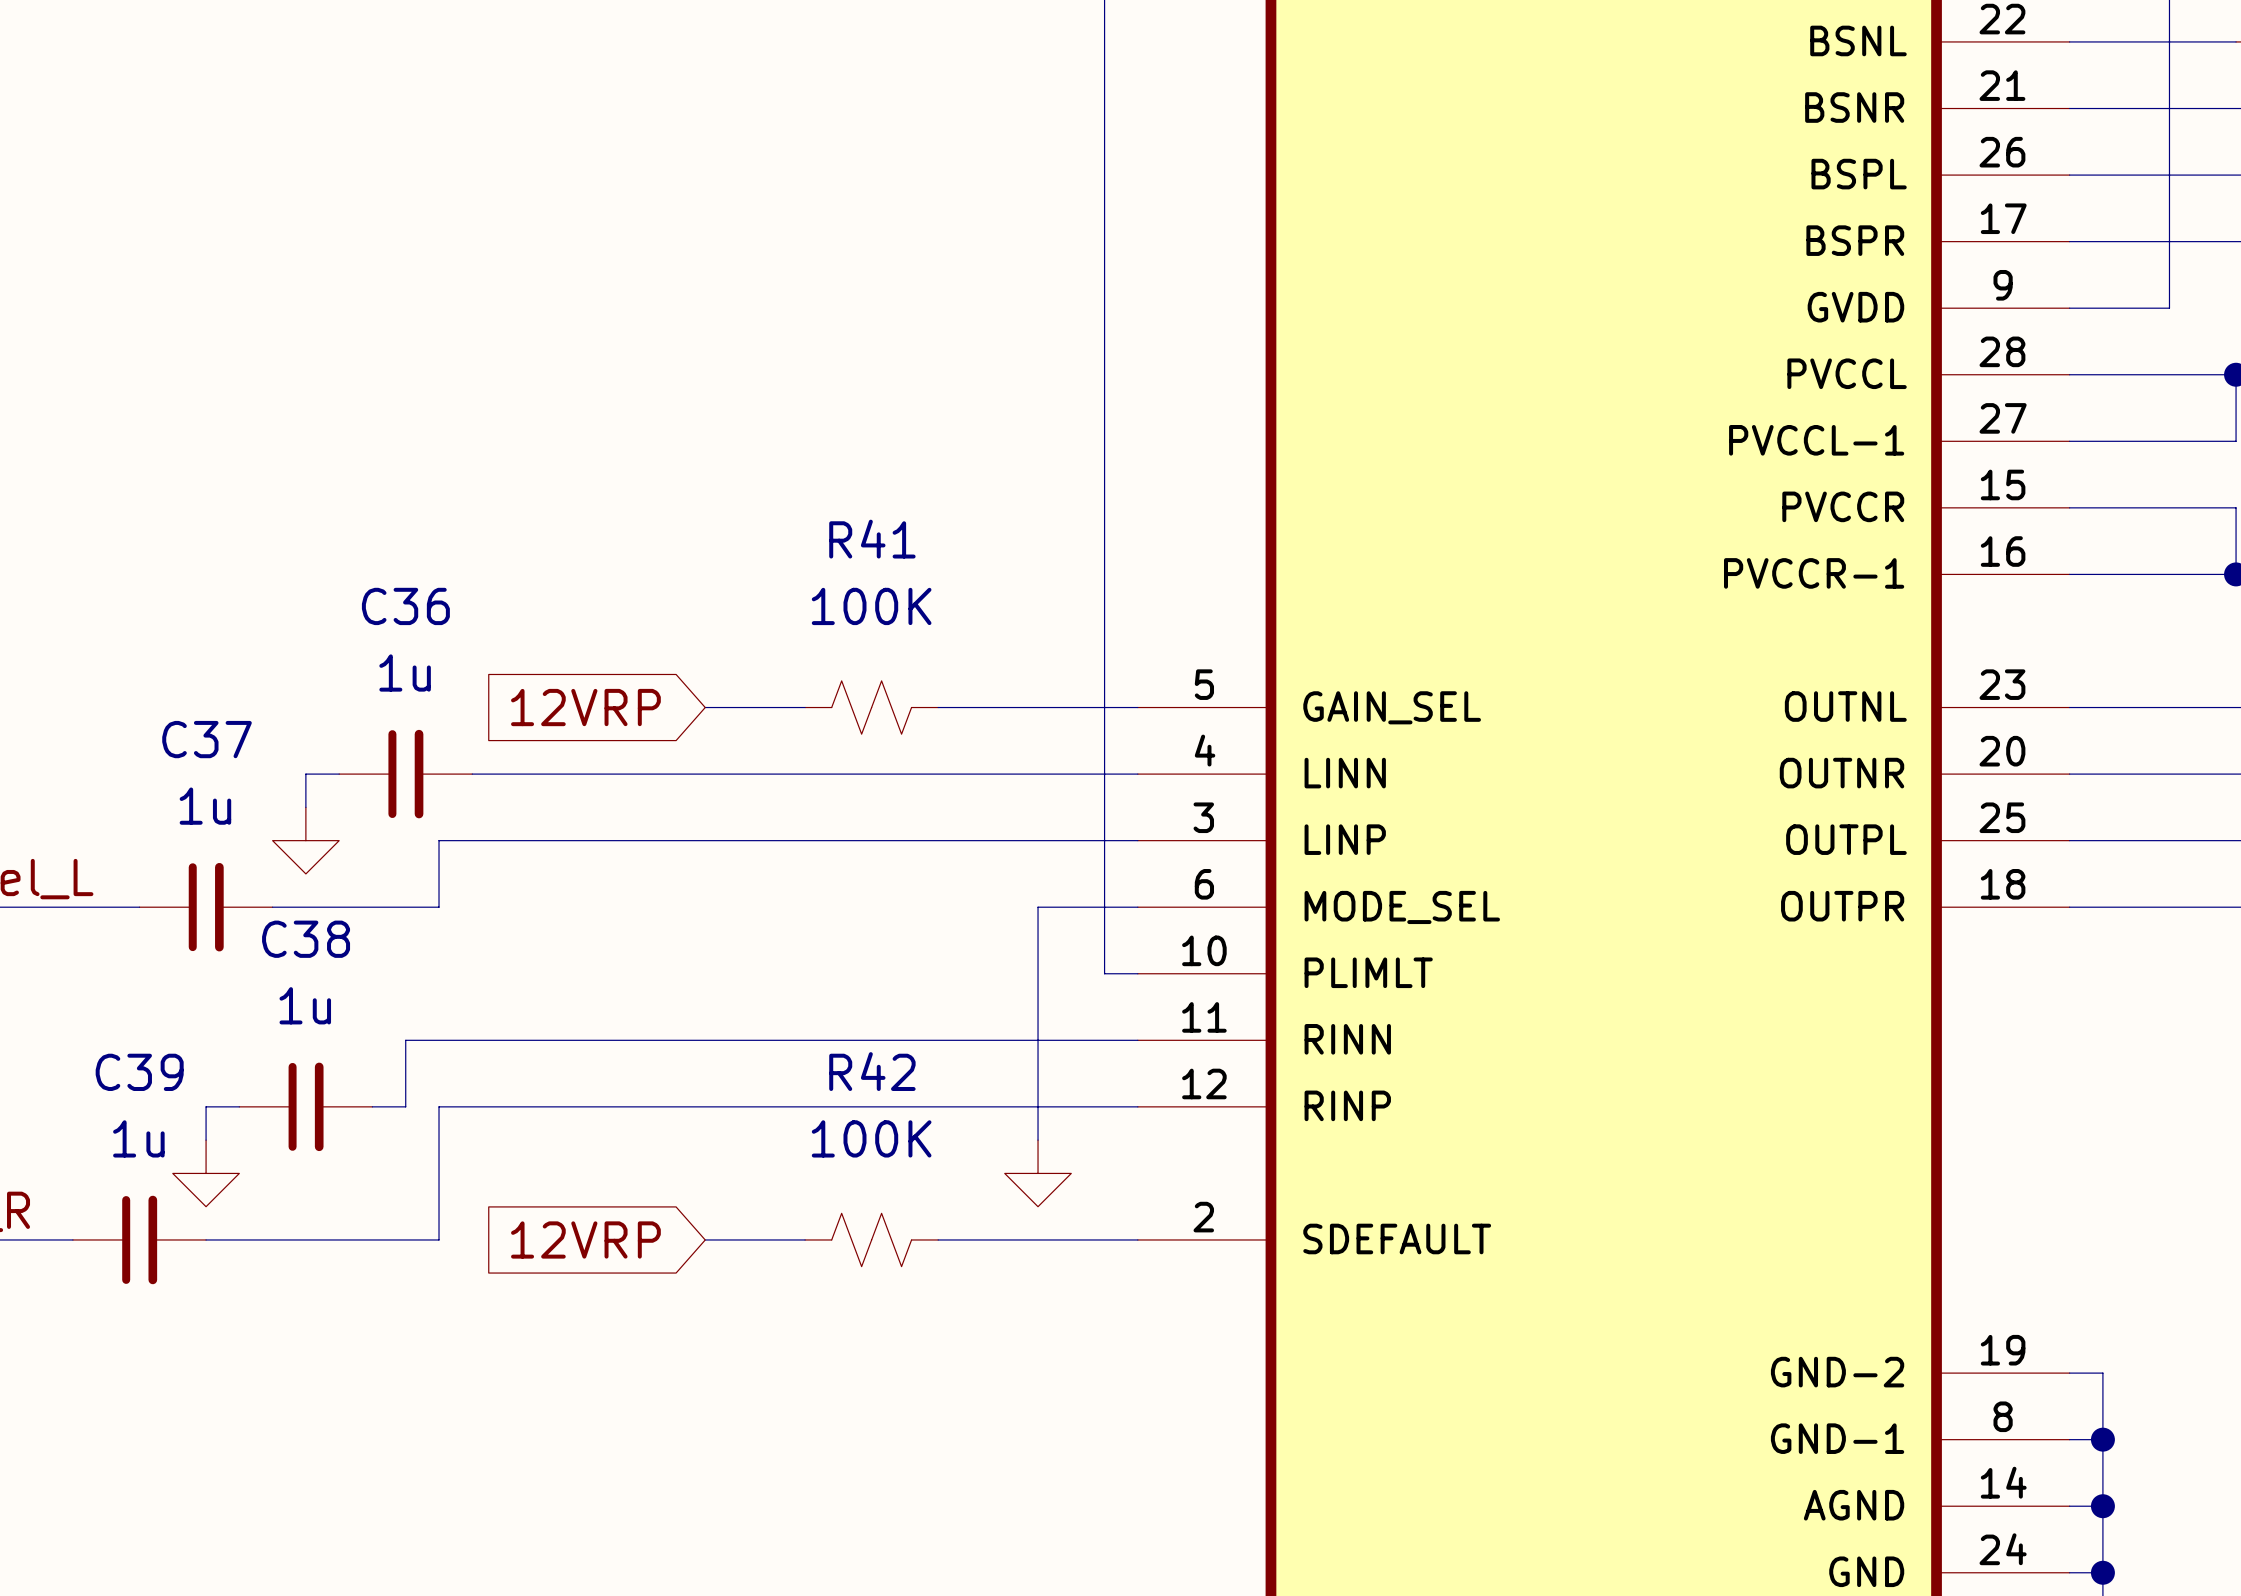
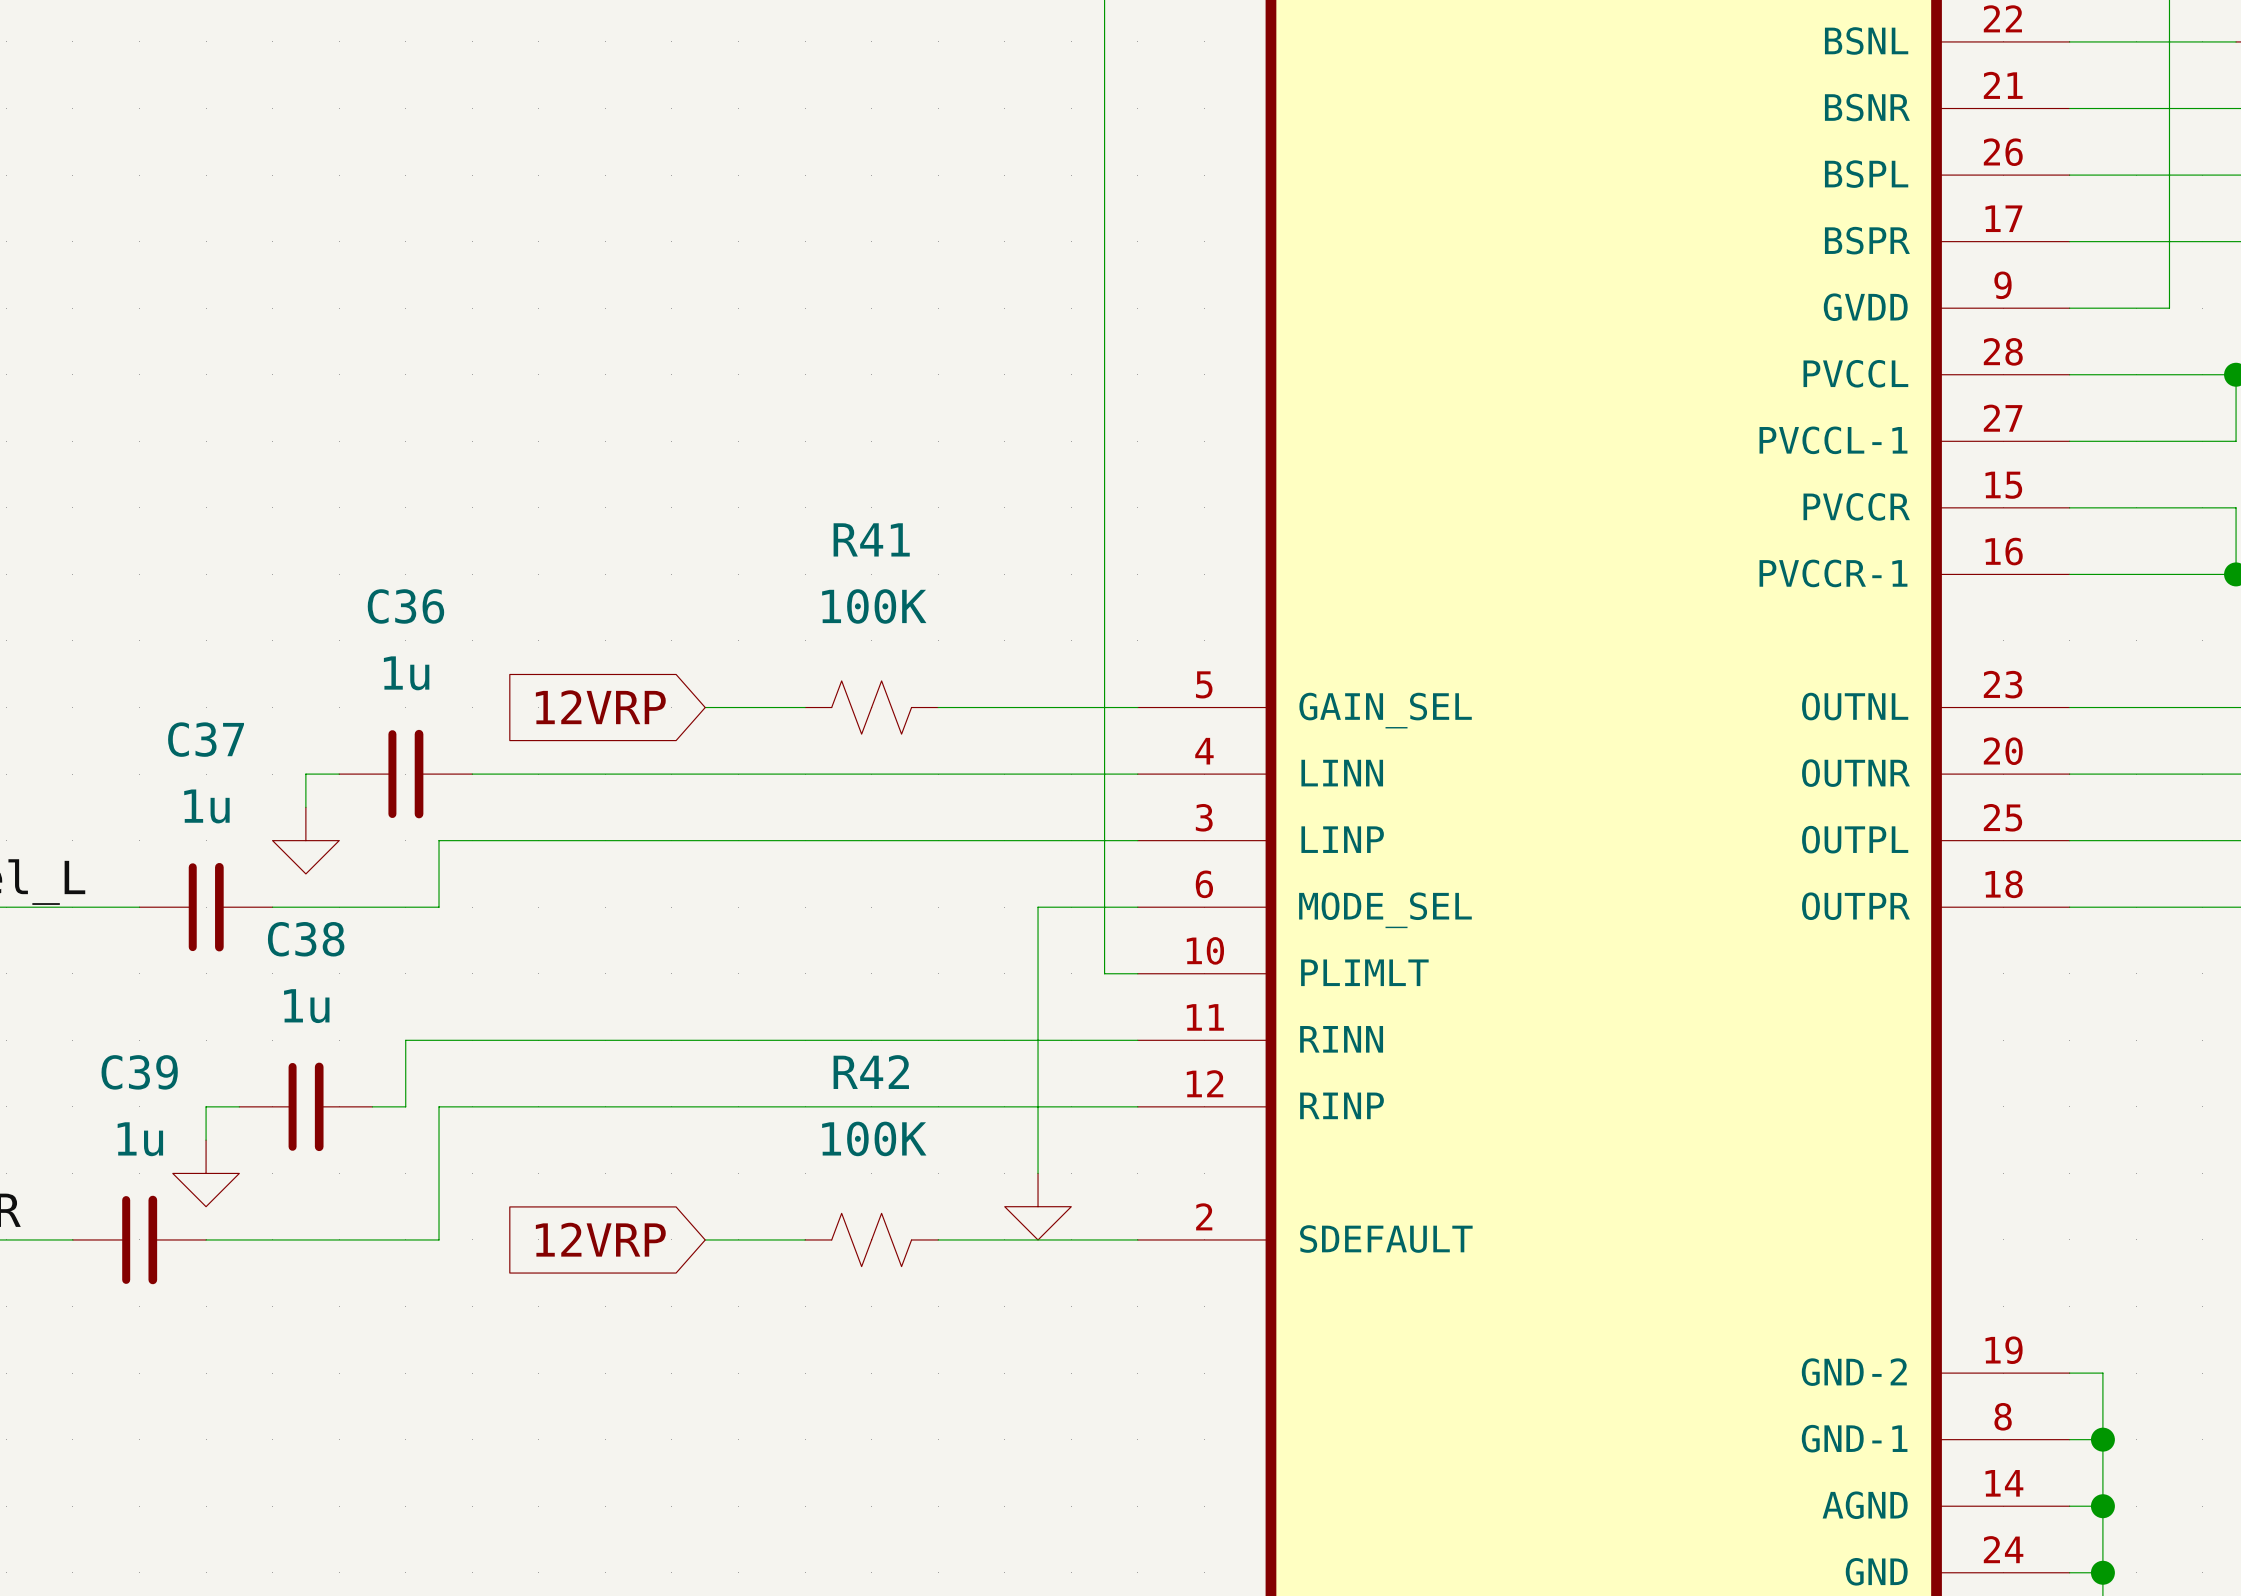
power symbol position: (1038, 1173) -> (1038, 1206)

